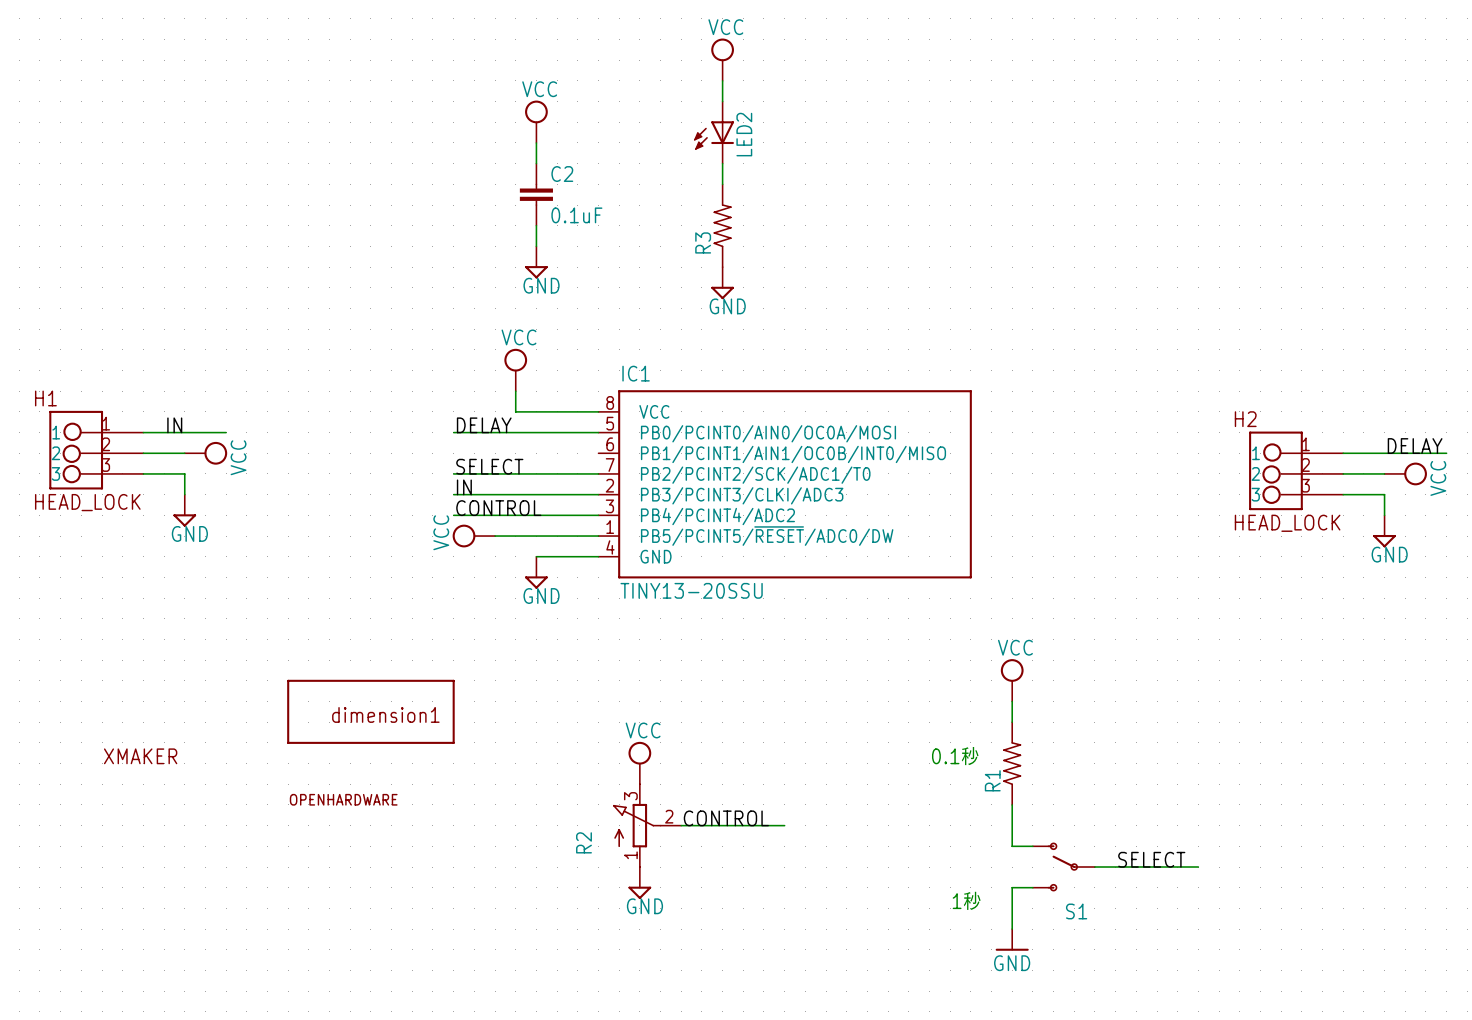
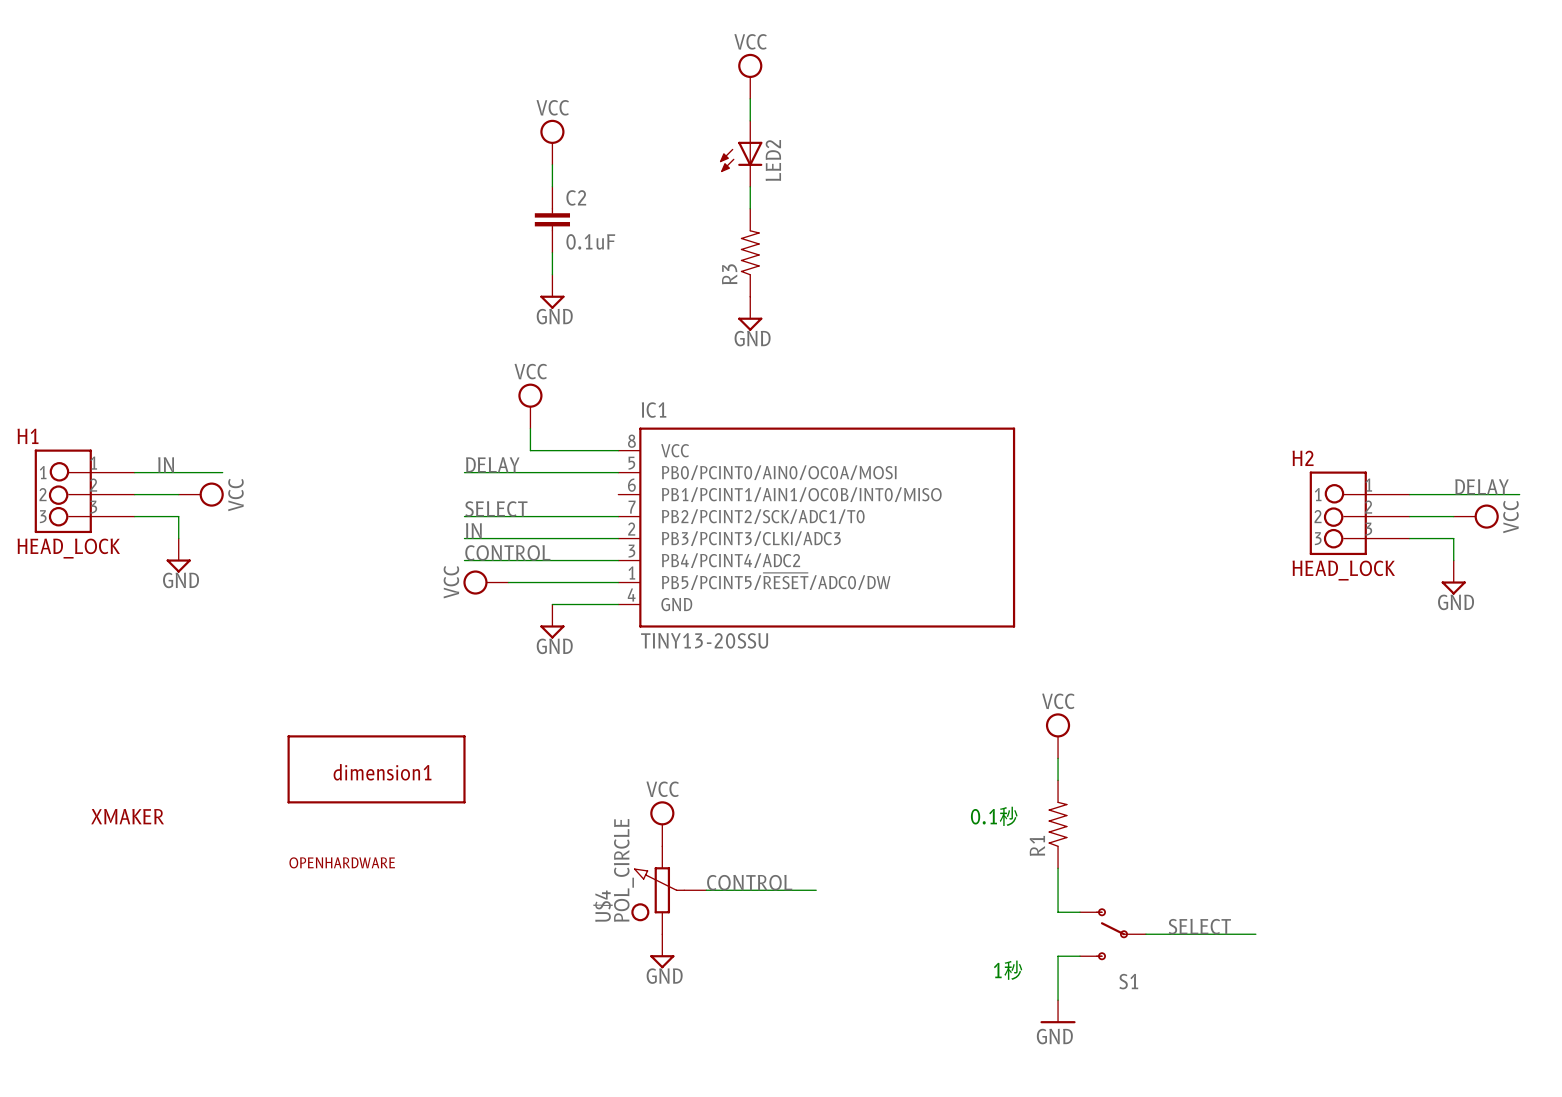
U$4: none -> POL_CIRCLE (668, 890)
R2: (647, 825) -> none

